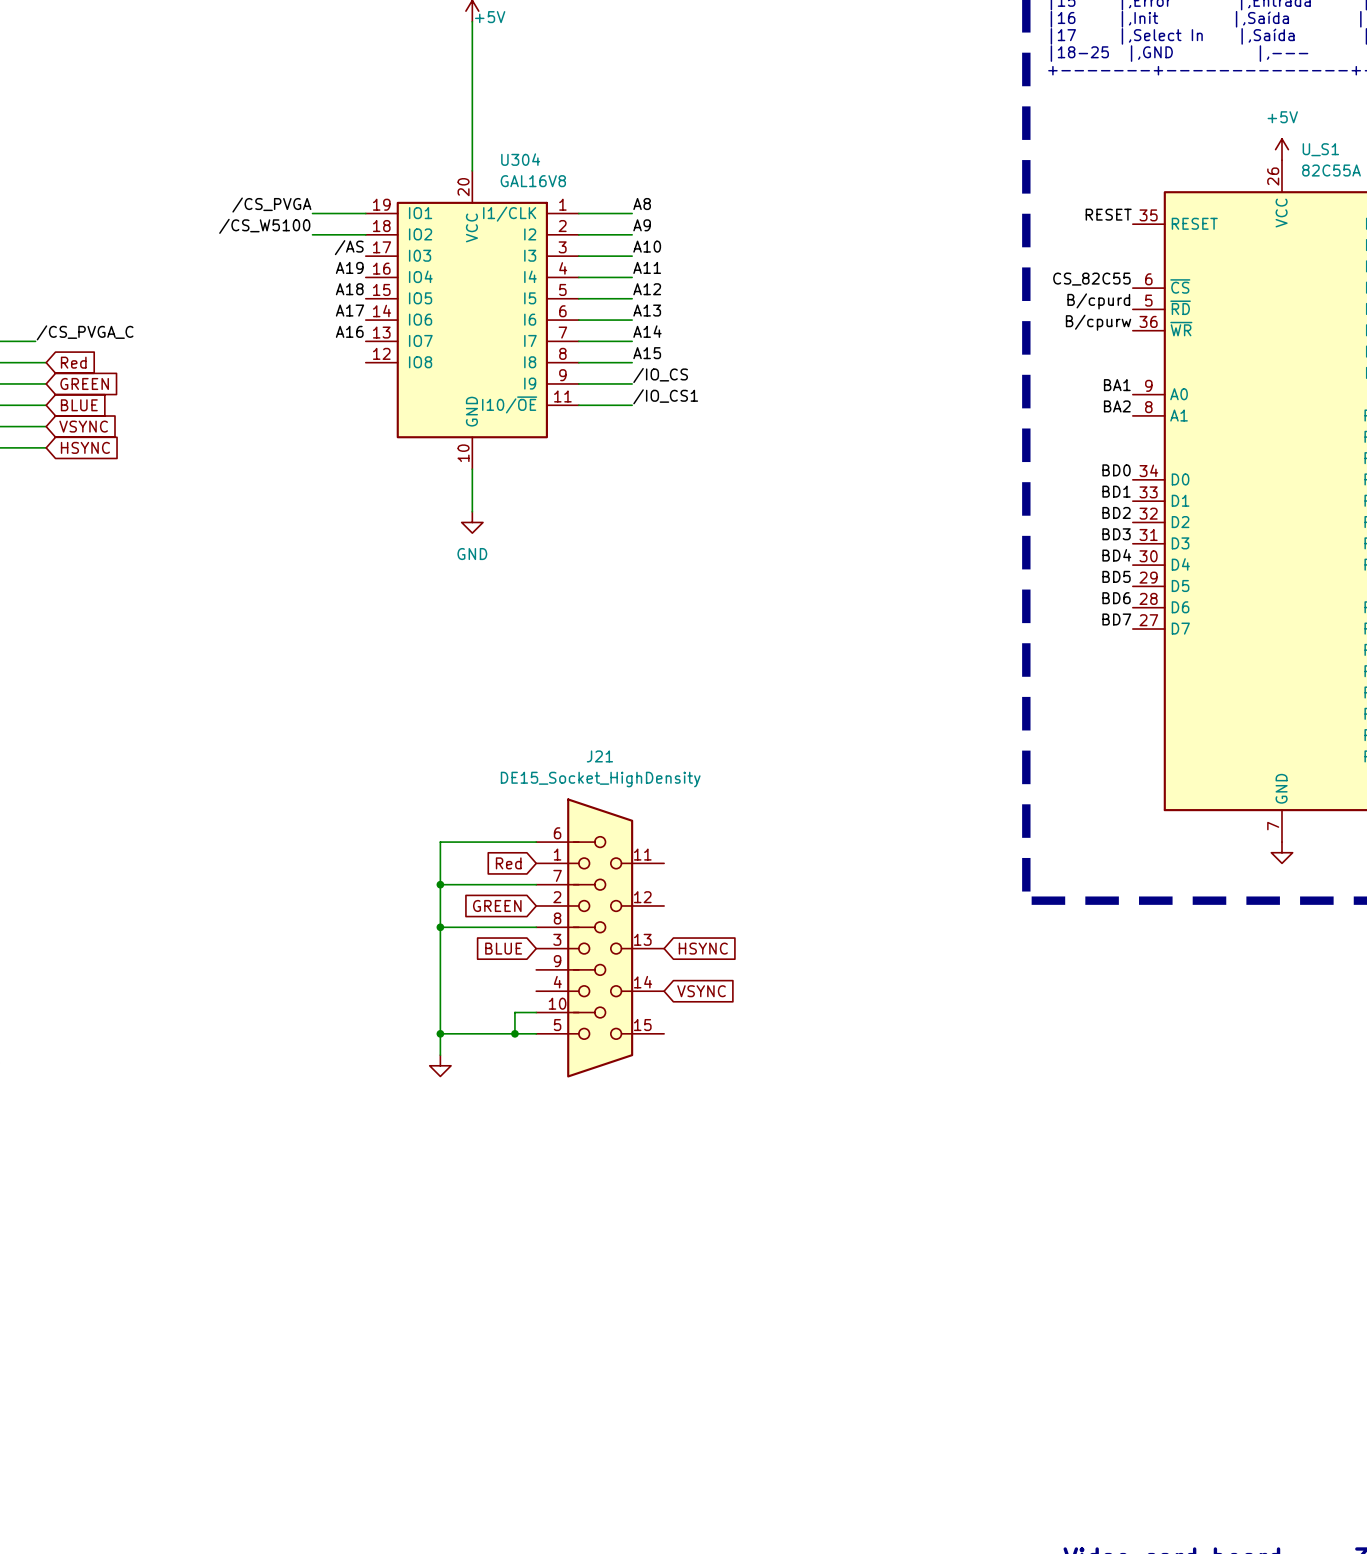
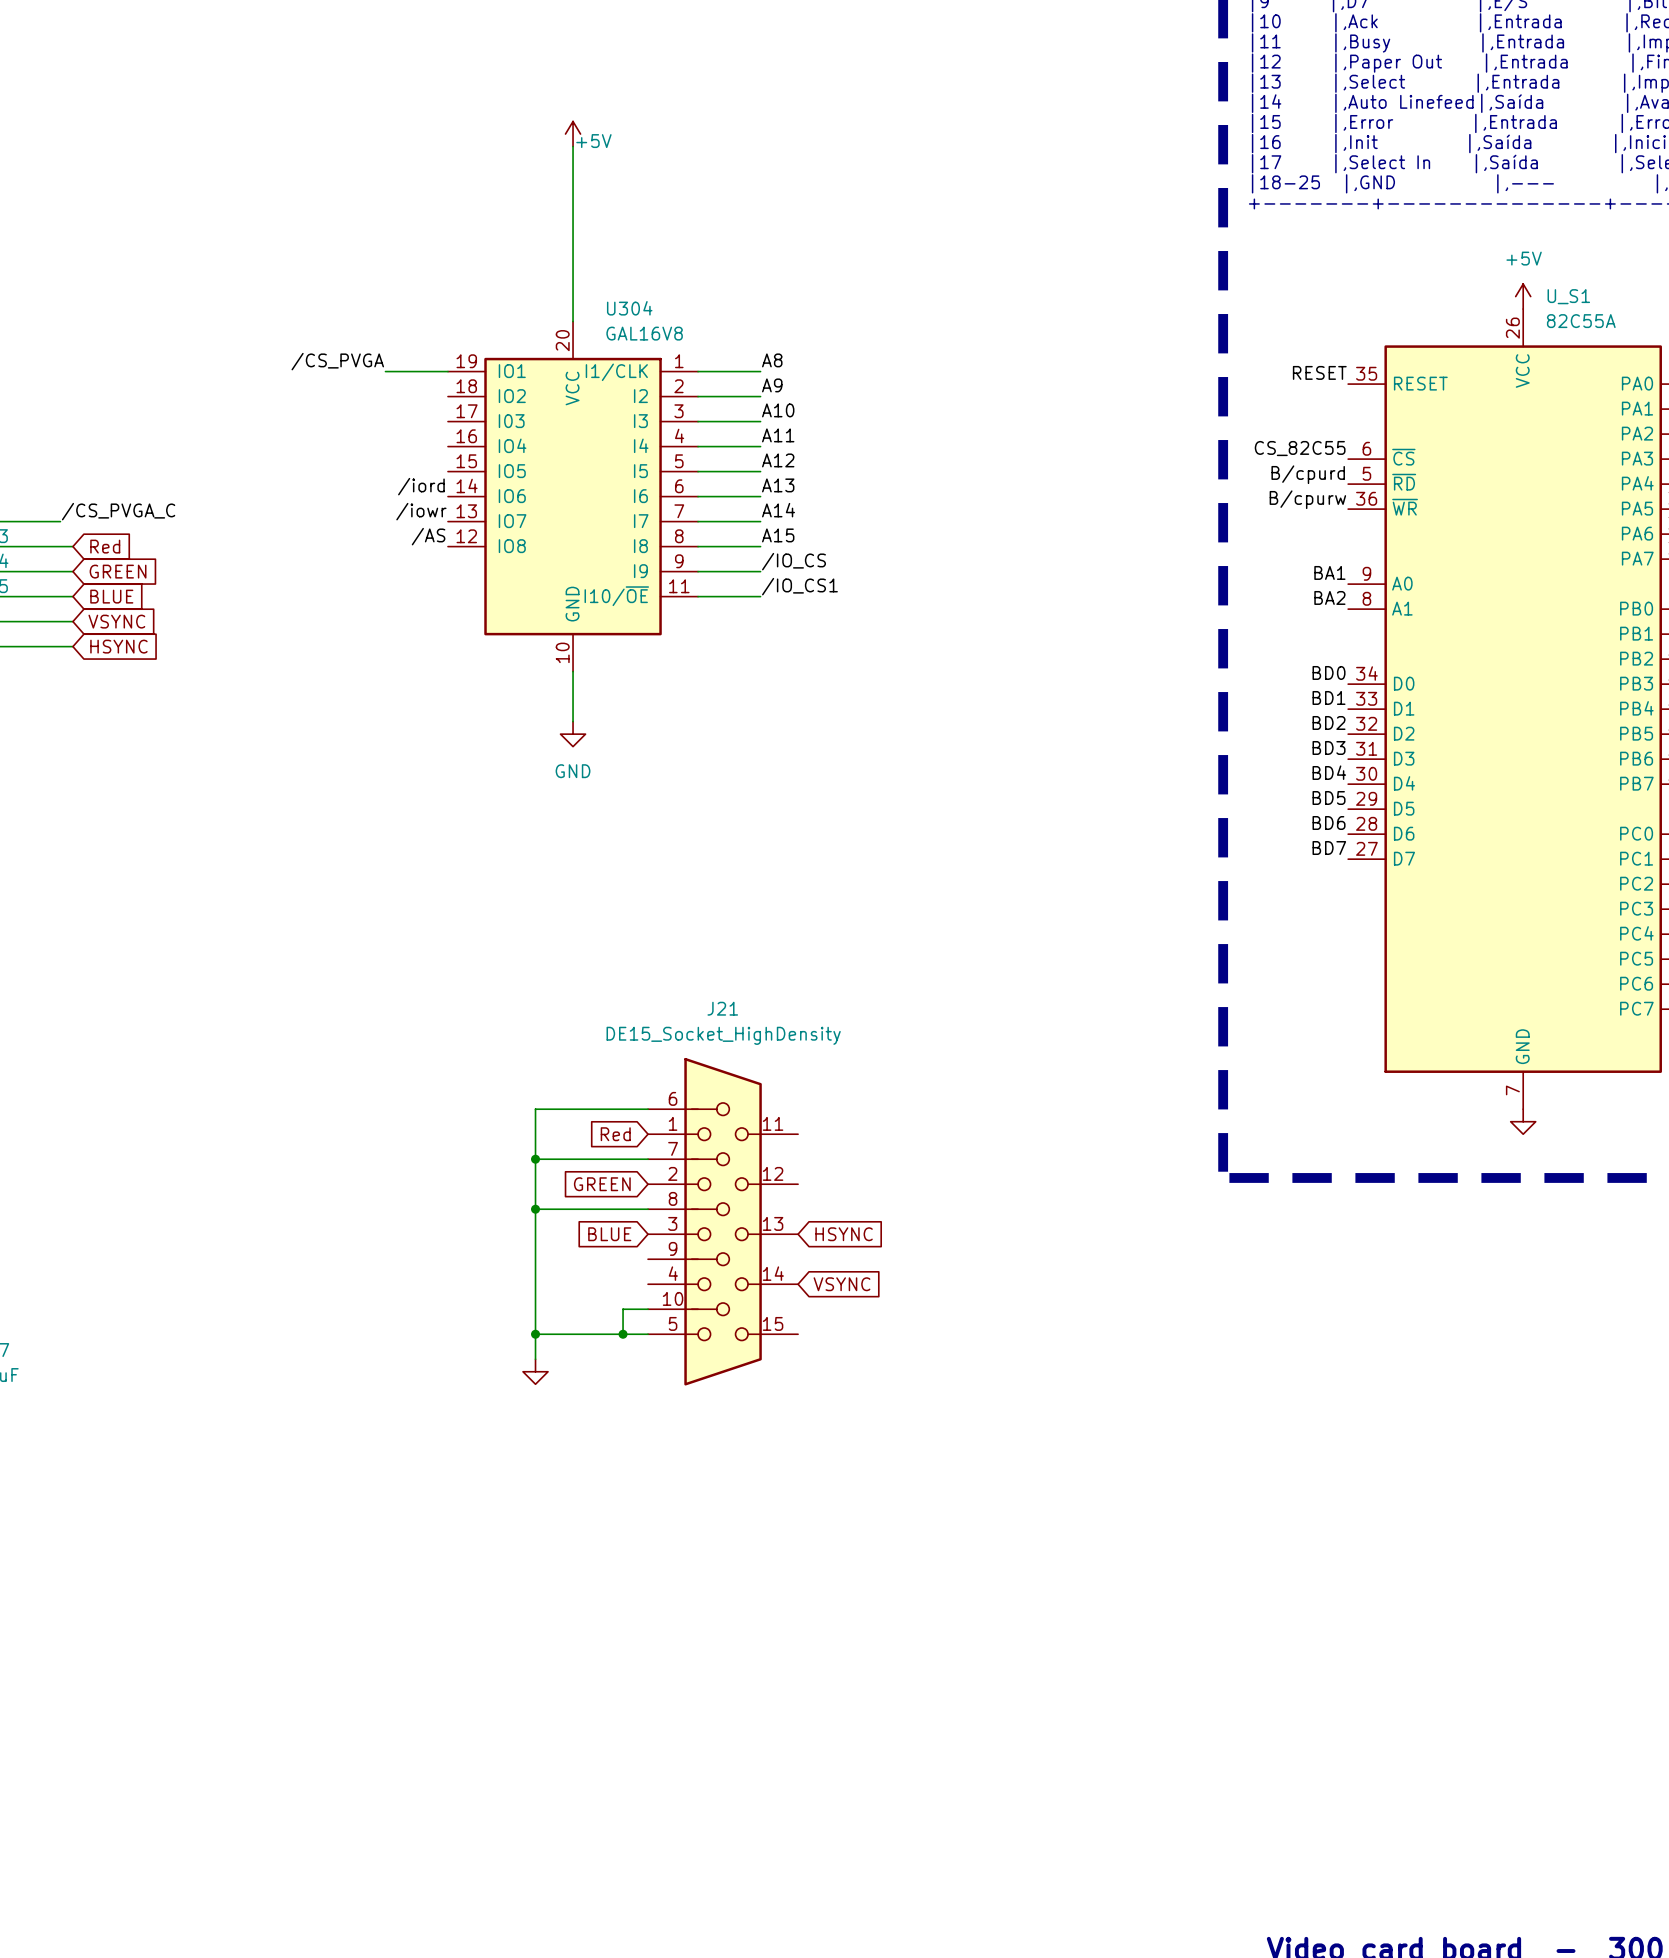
label: /CS_W5100 (264, 226) -> none
wire: (312, 234) (365, 234) -> none
label position: /AS (349, 247) -> /AS (428, 536)
label: A19 (349, 267) -> none
label: A18 (349, 289) -> none
label: A17 (350, 310) -> /iord (421, 486)
label: A16 (349, 331) -> /iowr (421, 511)

